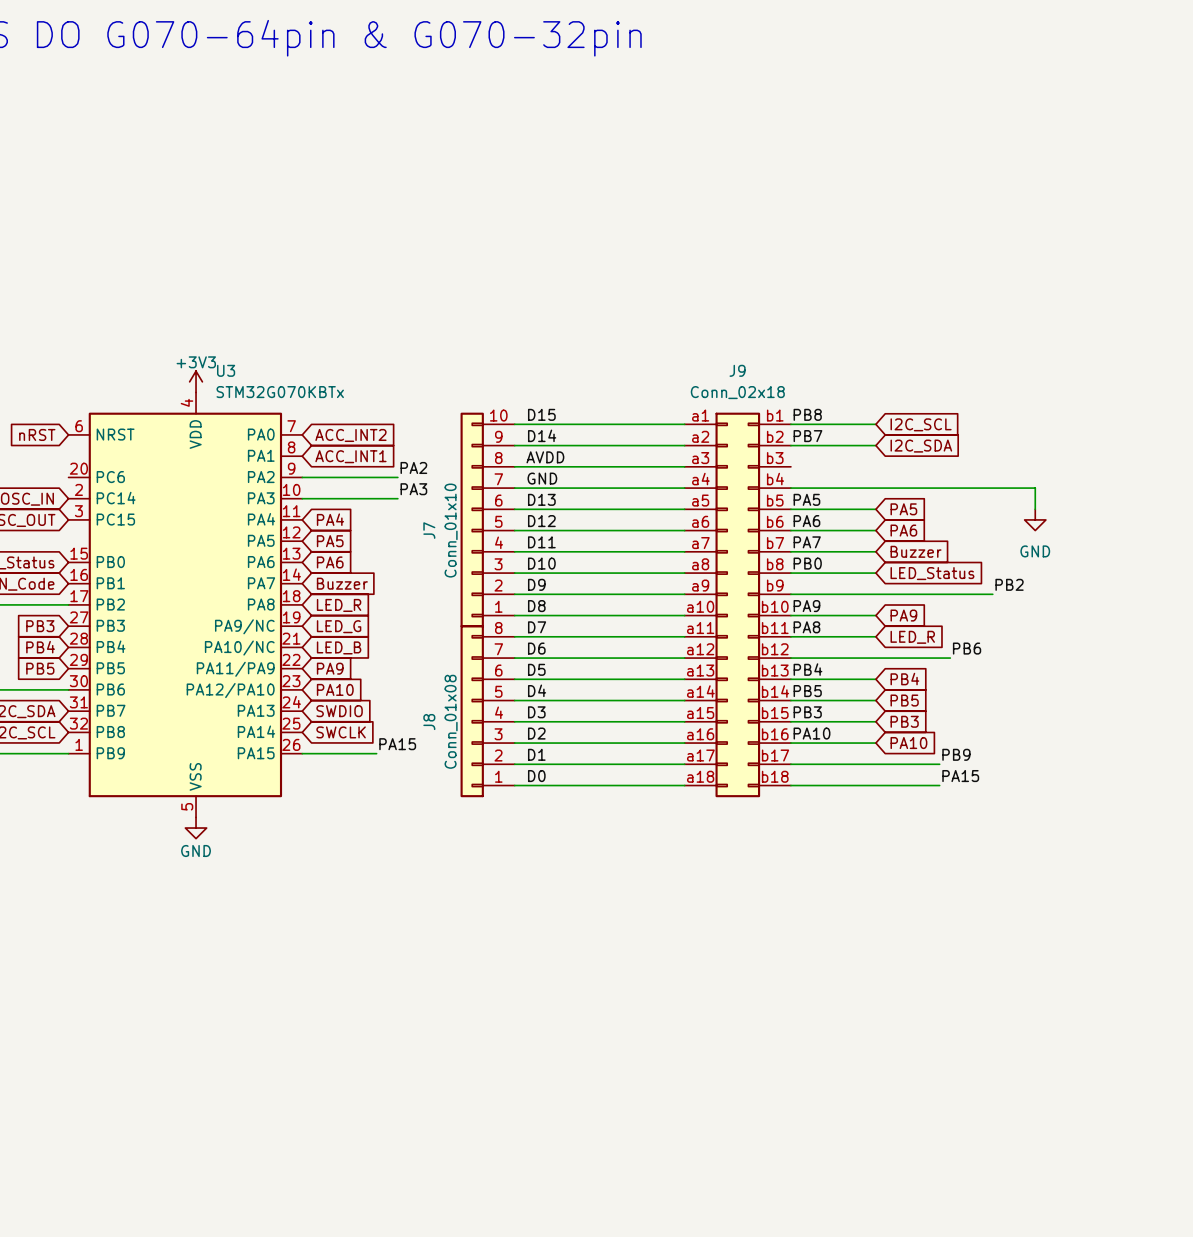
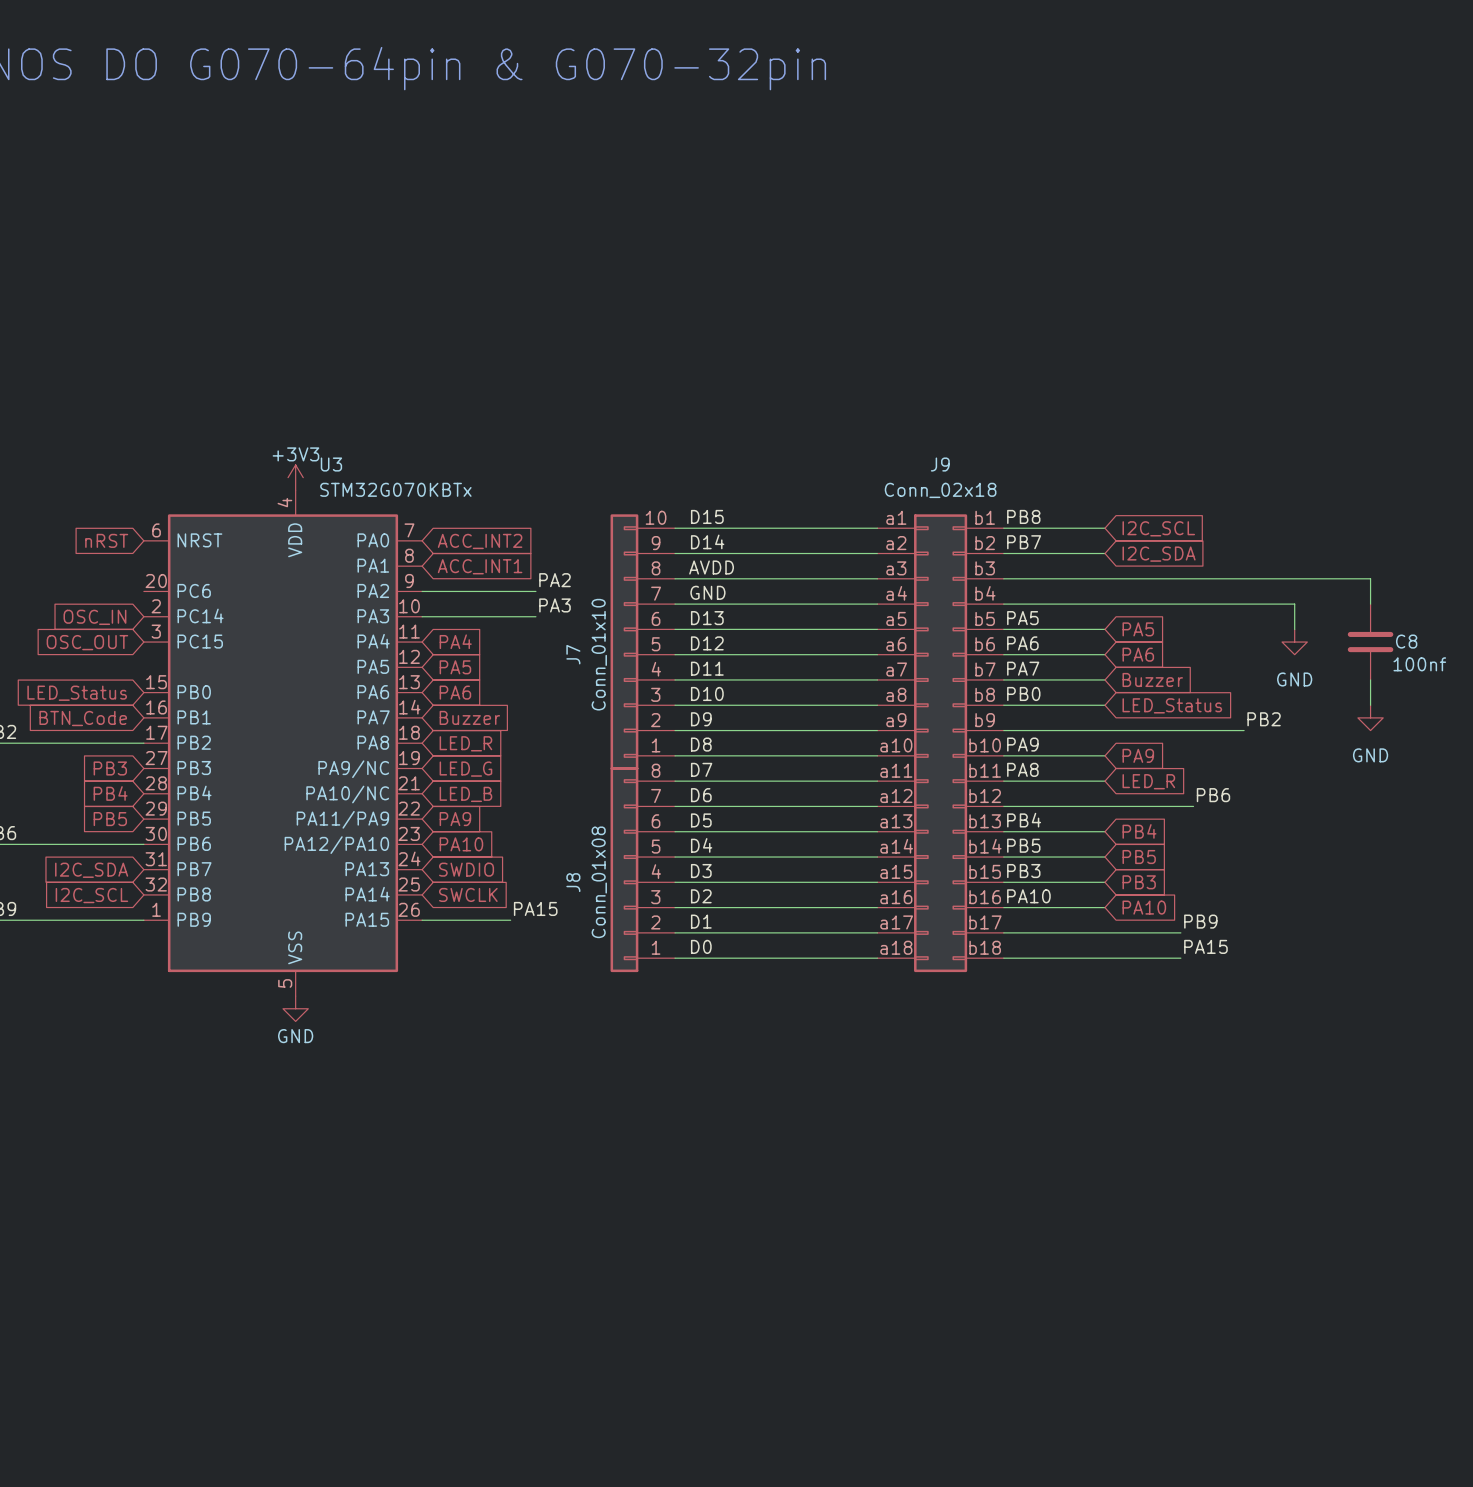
wire: none -> (1003, 578) (1370, 578) (1370, 604)
C8: none -> 100nf (1370, 642)
wire: none -> (1370, 679) (1370, 705)
power symbol: none -> GND (1370, 717)

